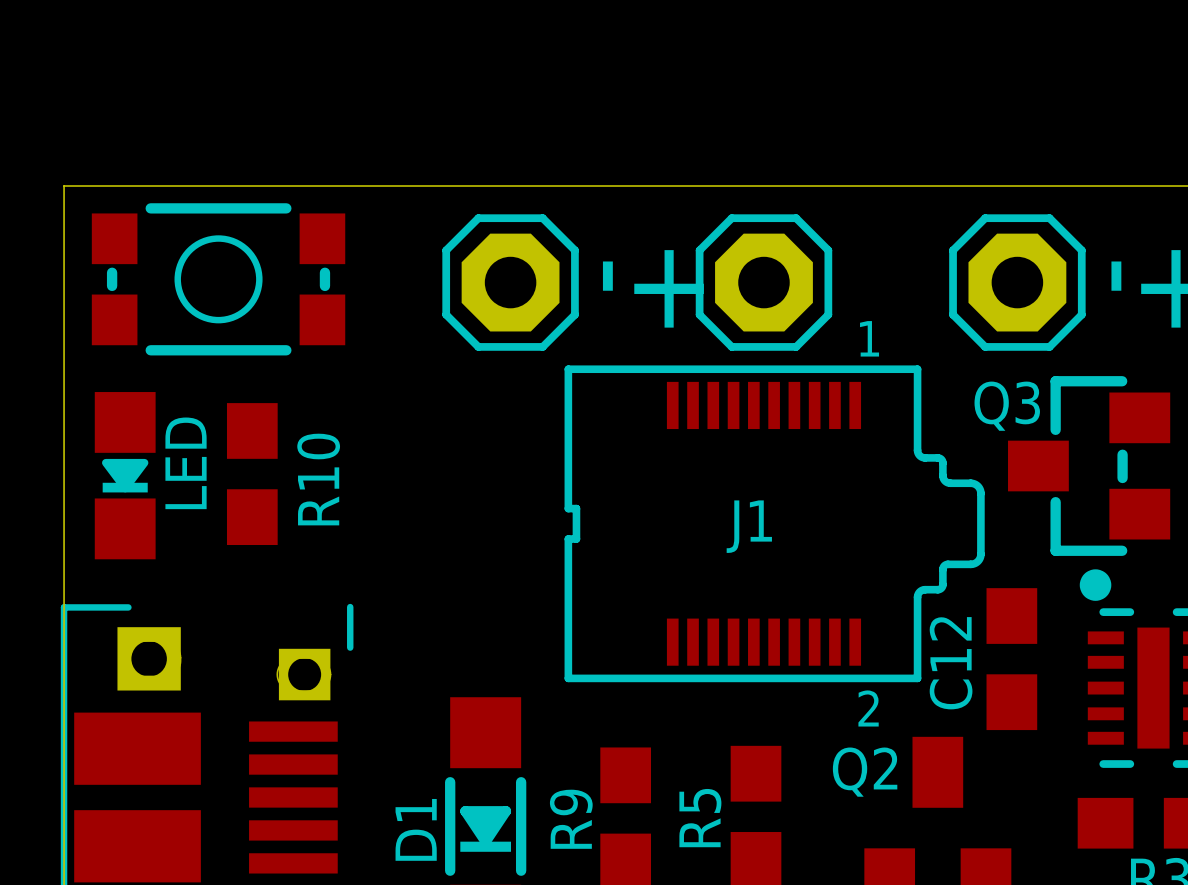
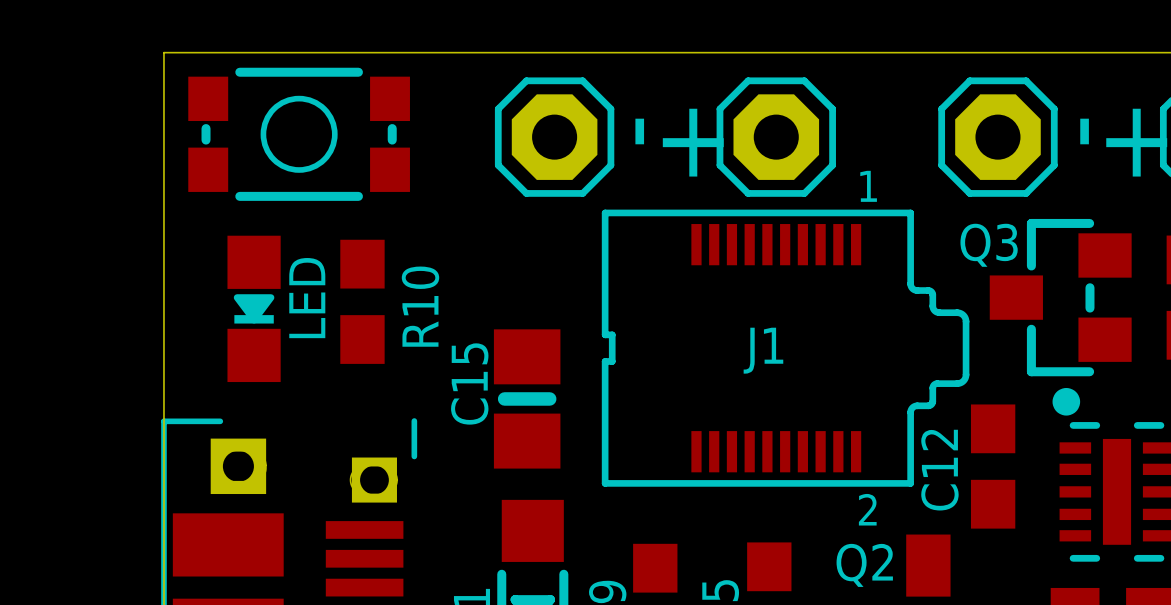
R10 position: (252, 474) -> (362, 301)
LED position: (125, 475) -> (254, 308)
C15: none -> (527, 398)

